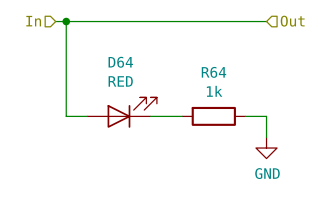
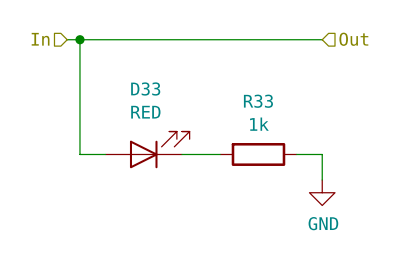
D64 name: D64 (120, 62) -> D33 (145, 88)
R64 name: R64 (213, 72) -> R33 (258, 101)

